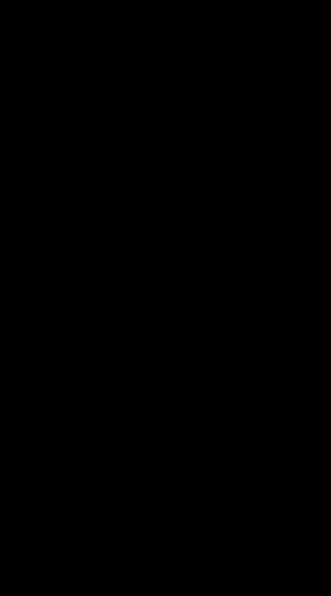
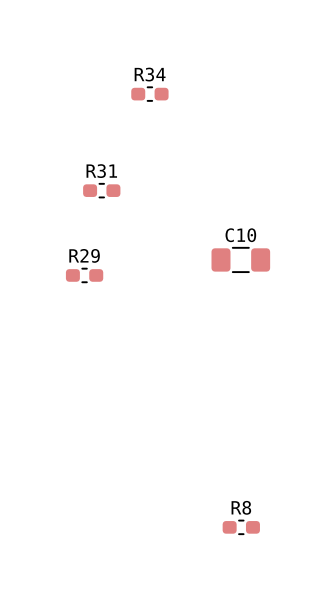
R34: none -> (149, 94)
R31: none -> (101, 190)
C10: none -> (240, 259)
R29: none -> (84, 275)
R8: none -> (241, 527)

